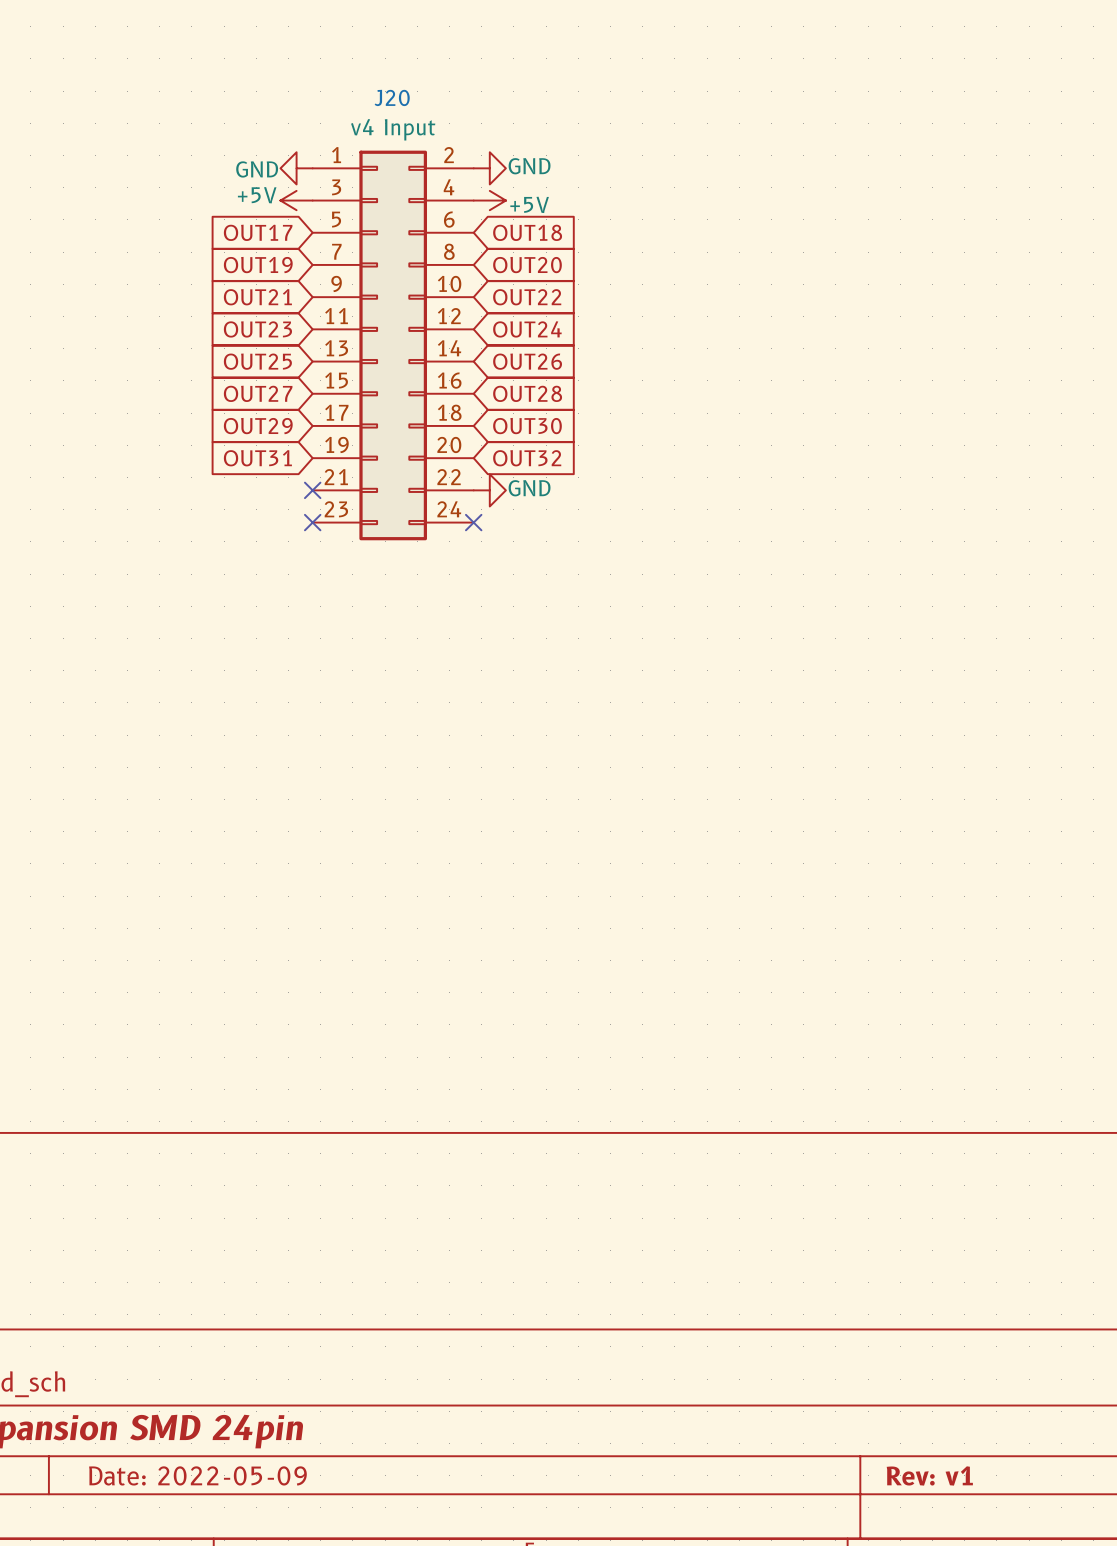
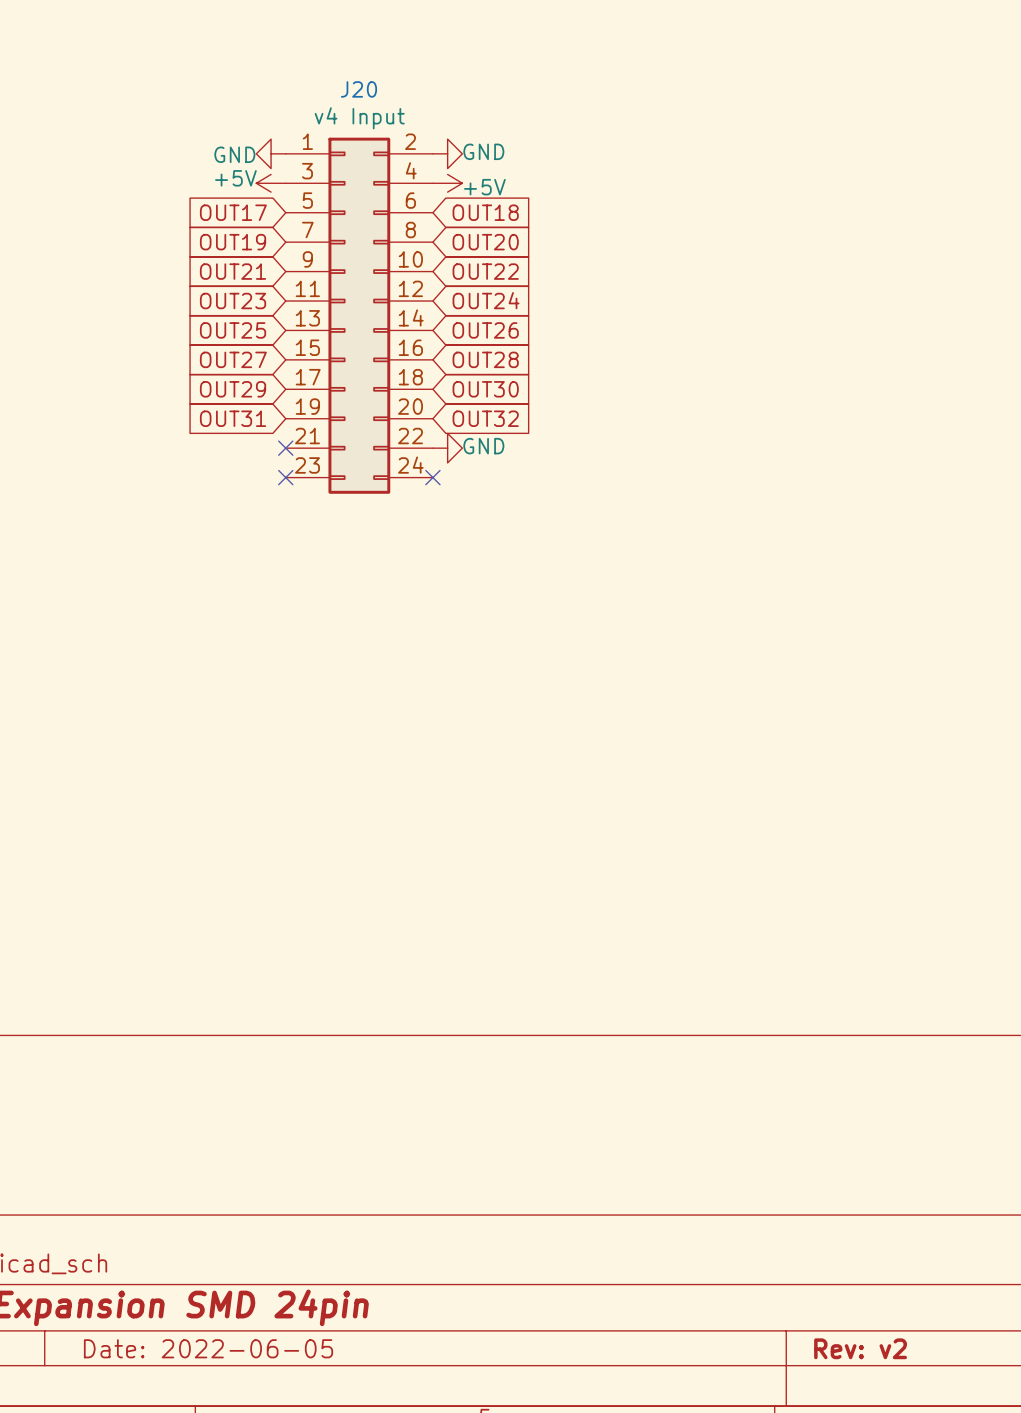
title block: Date: 2022-05-09 (197, 1475) -> Date: 2022-06-05 (208, 1348)
title block: Rev: v1 (929, 1475) -> Rev: v2 (860, 1348)

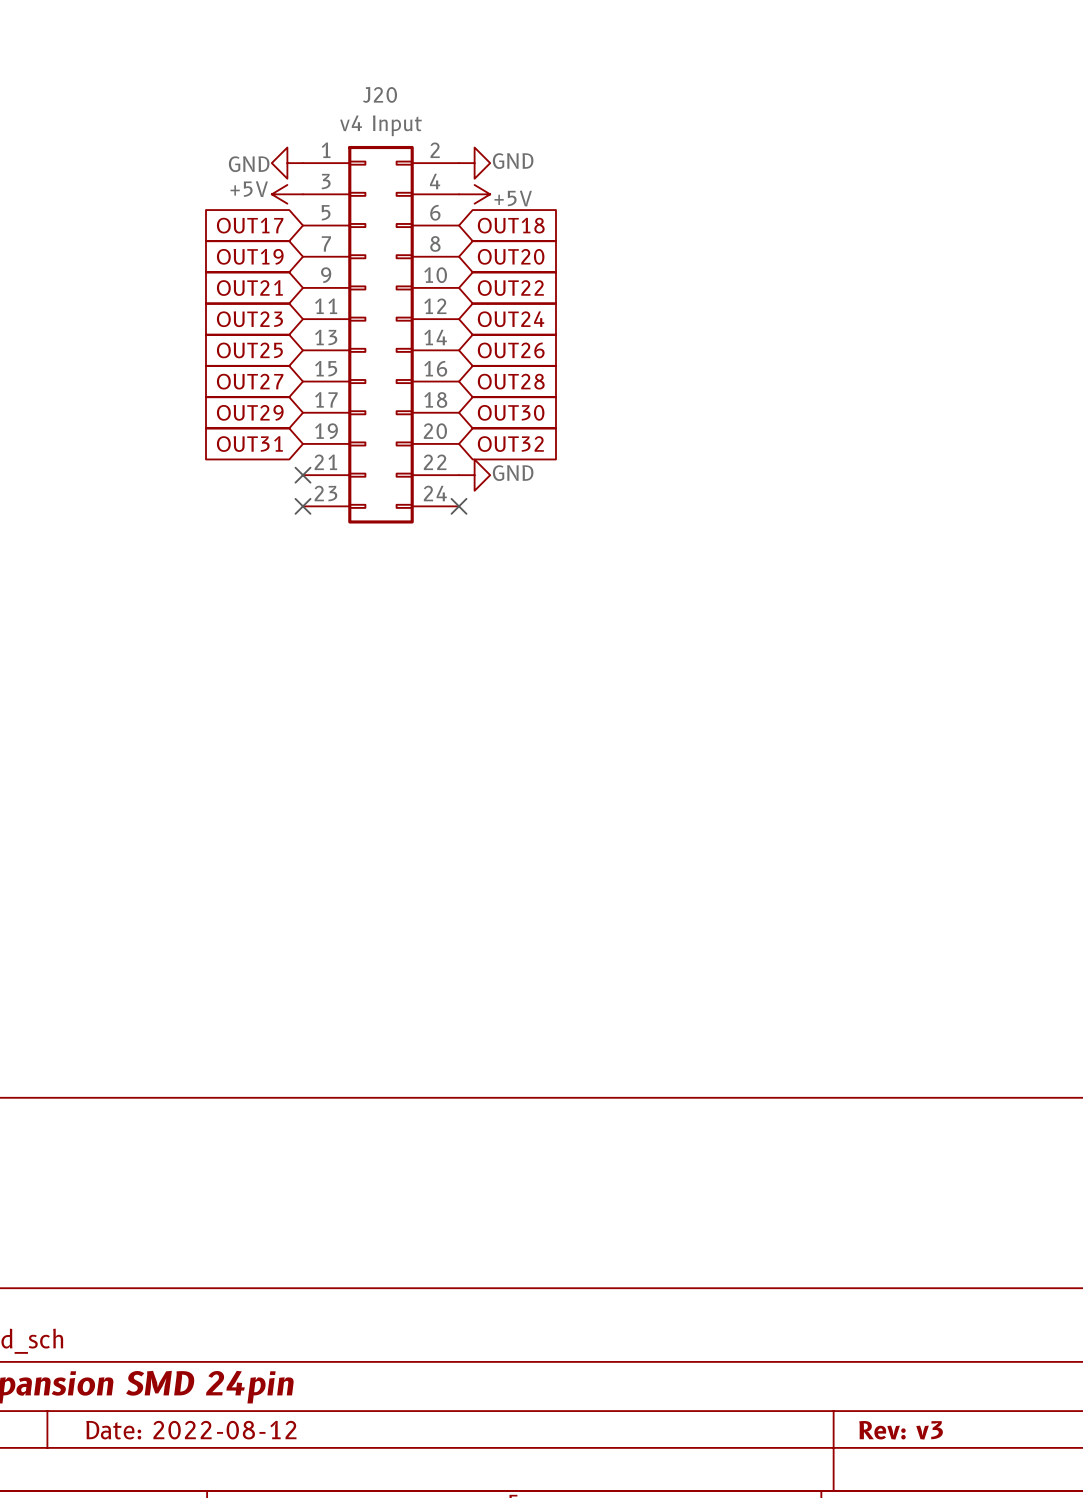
title block: Date: 2022-06-05 (208, 1348) -> Date: 2022-08-12 (191, 1430)
title block: Rev: v2 (860, 1348) -> Rev: v3 (901, 1430)

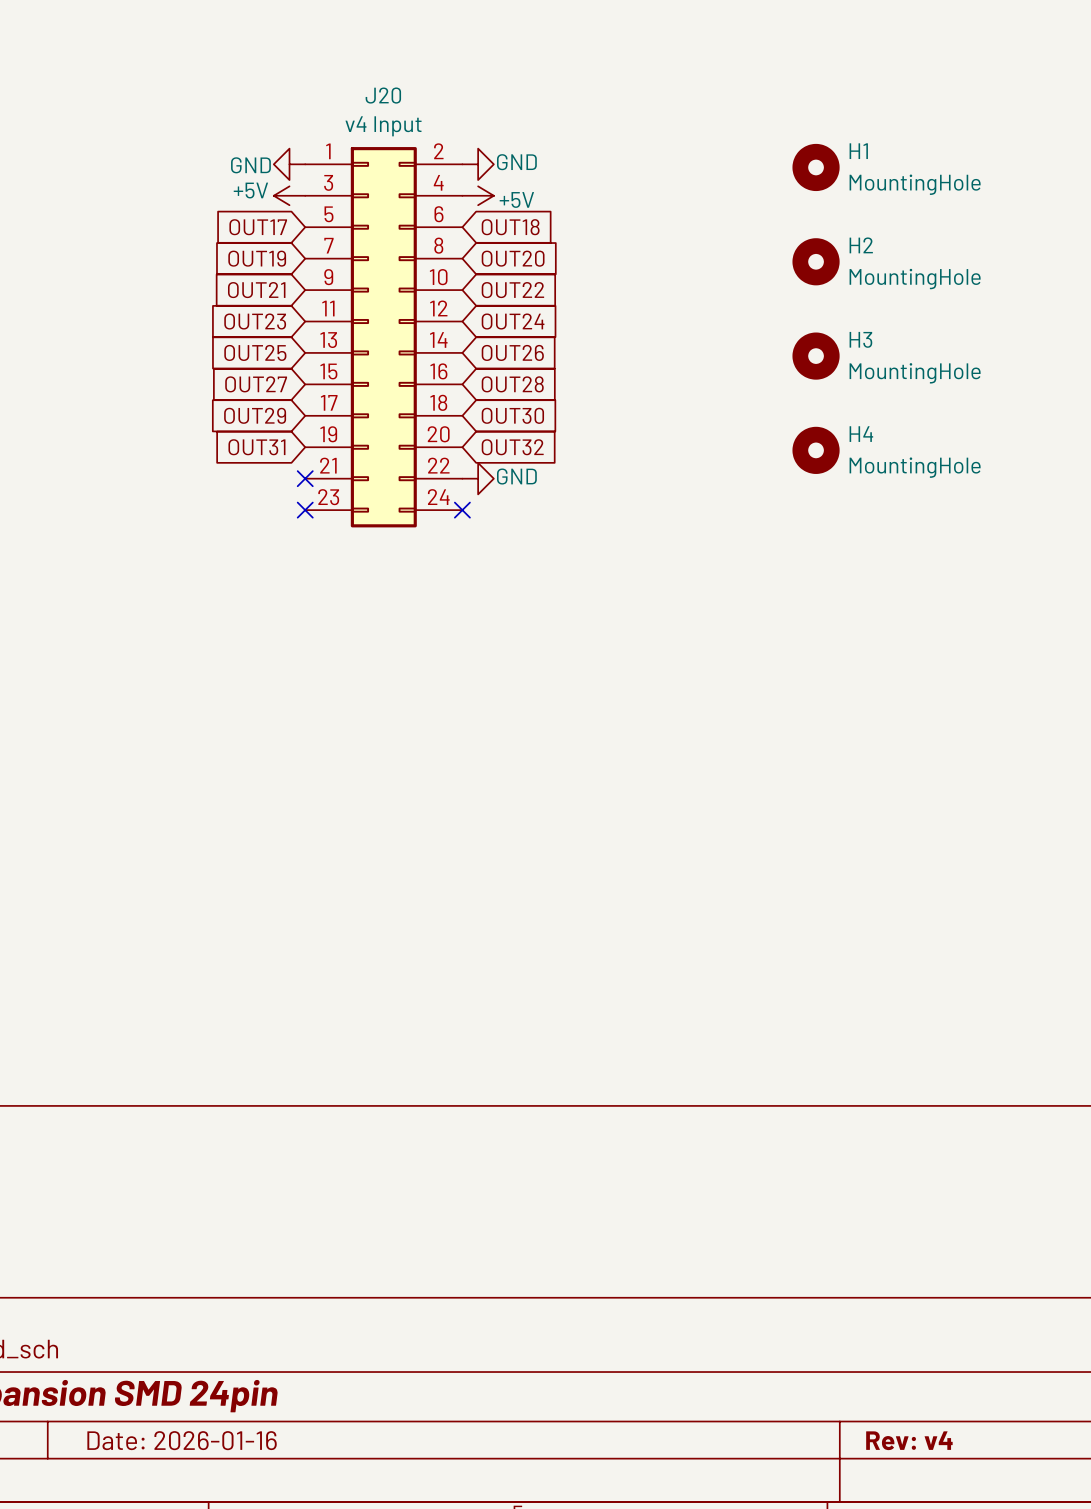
H1: none -> MountingHole (816, 167)
H2: none -> MountingHole (816, 261)
H3: none -> MountingHole (816, 356)
H4: none -> MountingHole (816, 450)
title block: Date: 2022-08-12 (191, 1430) -> Date: 2026-01-16 (182, 1440)
title block: Rev: v3 (901, 1430) -> Rev: v4 (909, 1440)

